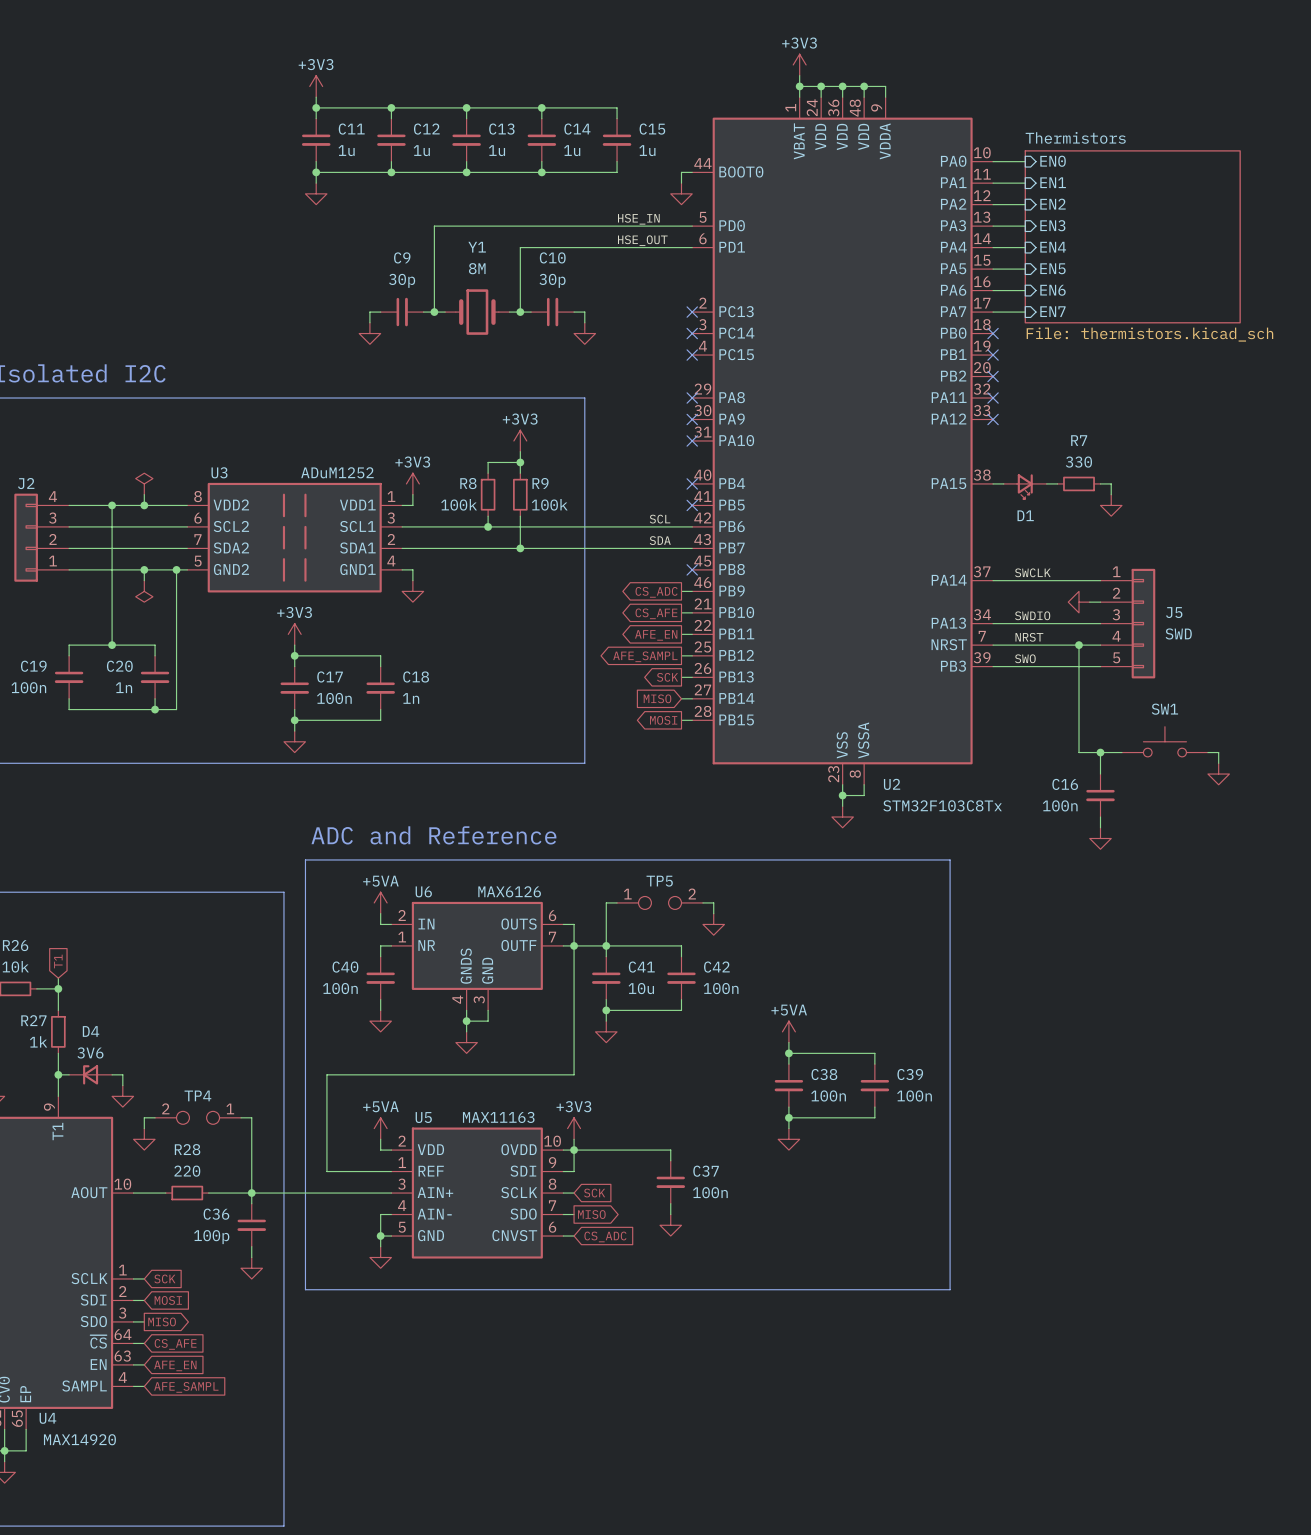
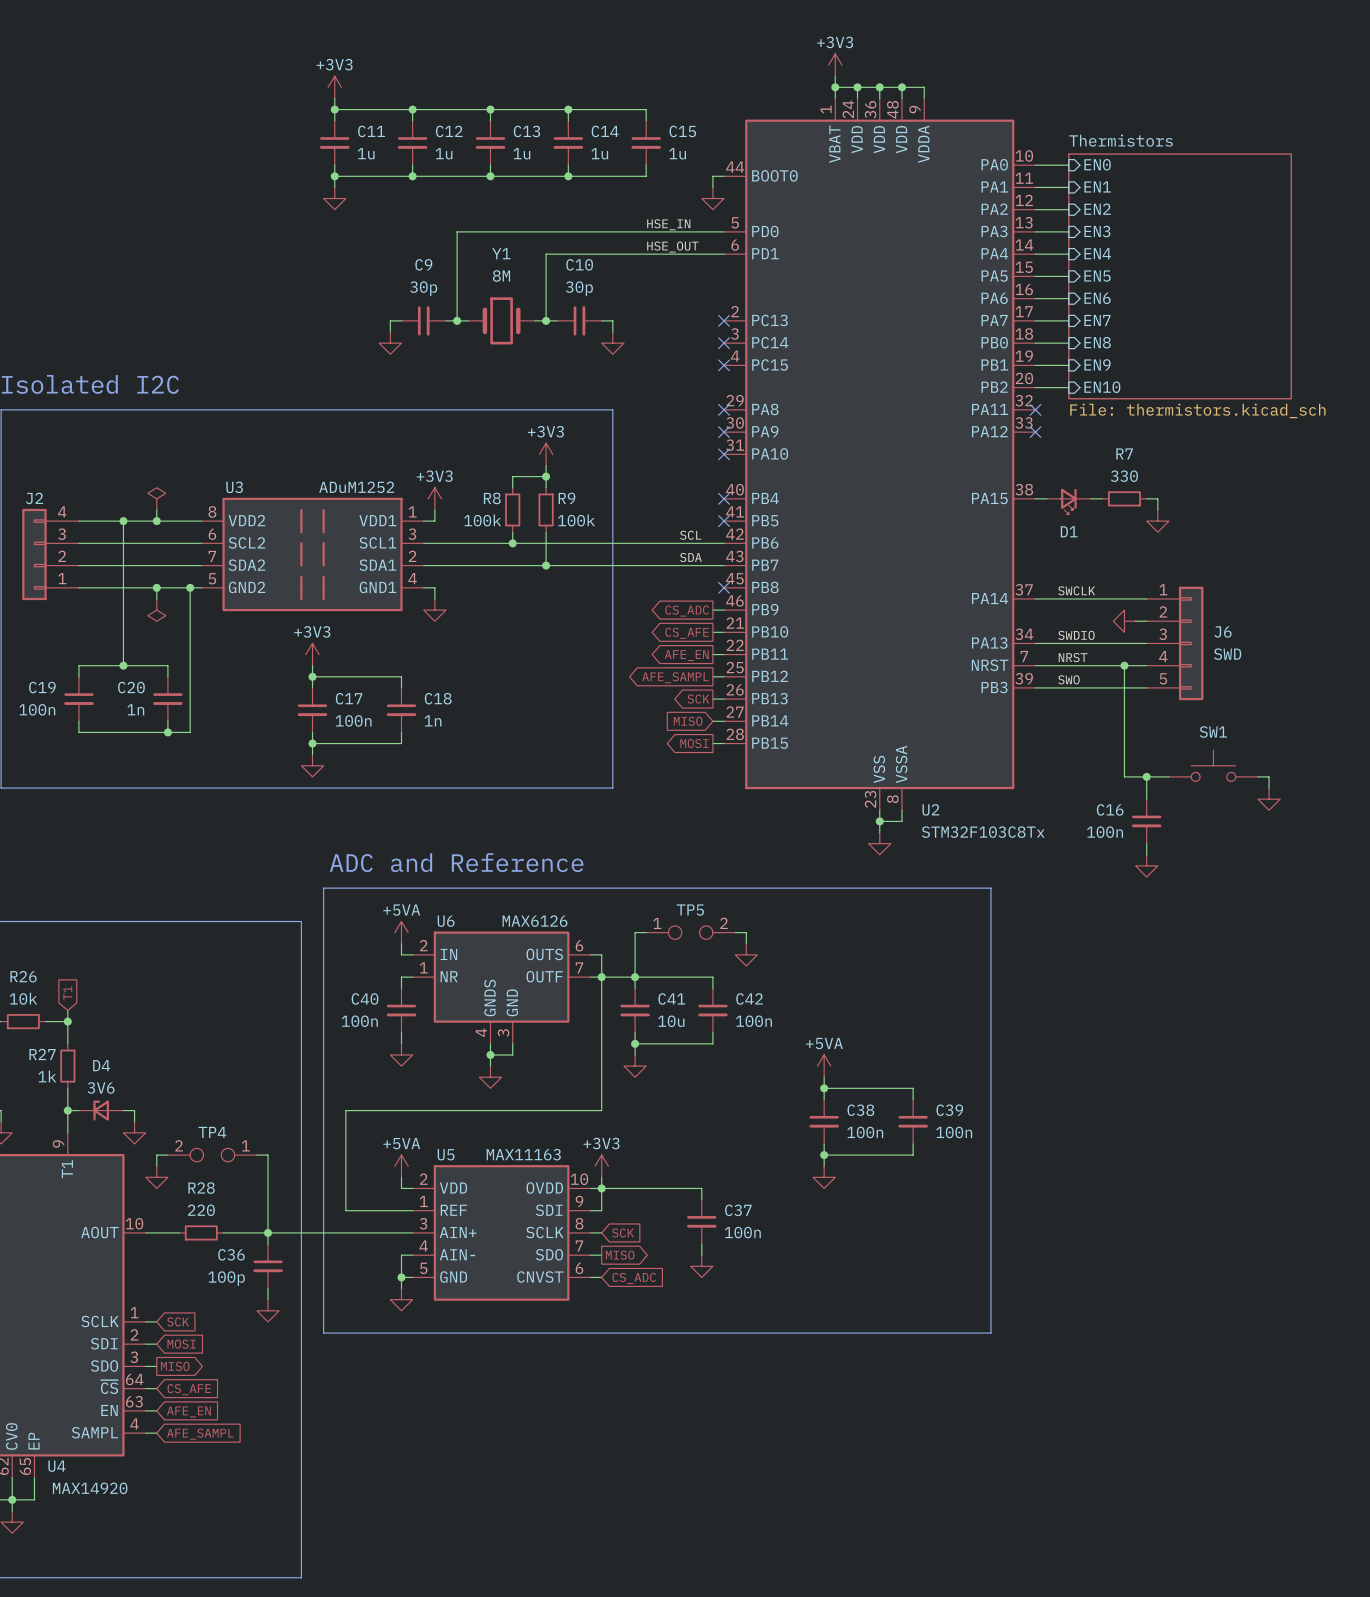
sheet Thermistors: File: thermistors.kicad_sch (1132, 236) -> none
sheet Thermistors: none -> File: thermistors.kicad_sch (1180, 276)
wire: none -> (1035, 343) (1068, 343)
no-connect mark: (993, 333) -> none
sheet pin: none -> EN8 (1097, 342)
sheet pin: none -> EN9 (1097, 364)
wire: none -> (1035, 365) (1068, 365)
no-connect mark: (993, 355) -> none
wire: none -> (1035, 387) (1068, 387)
no-connect mark: (993, 376) -> none
sheet pin: none -> EN10 (1102, 387)
J5 name: J5 (1174, 612) -> J6 (1223, 632)

